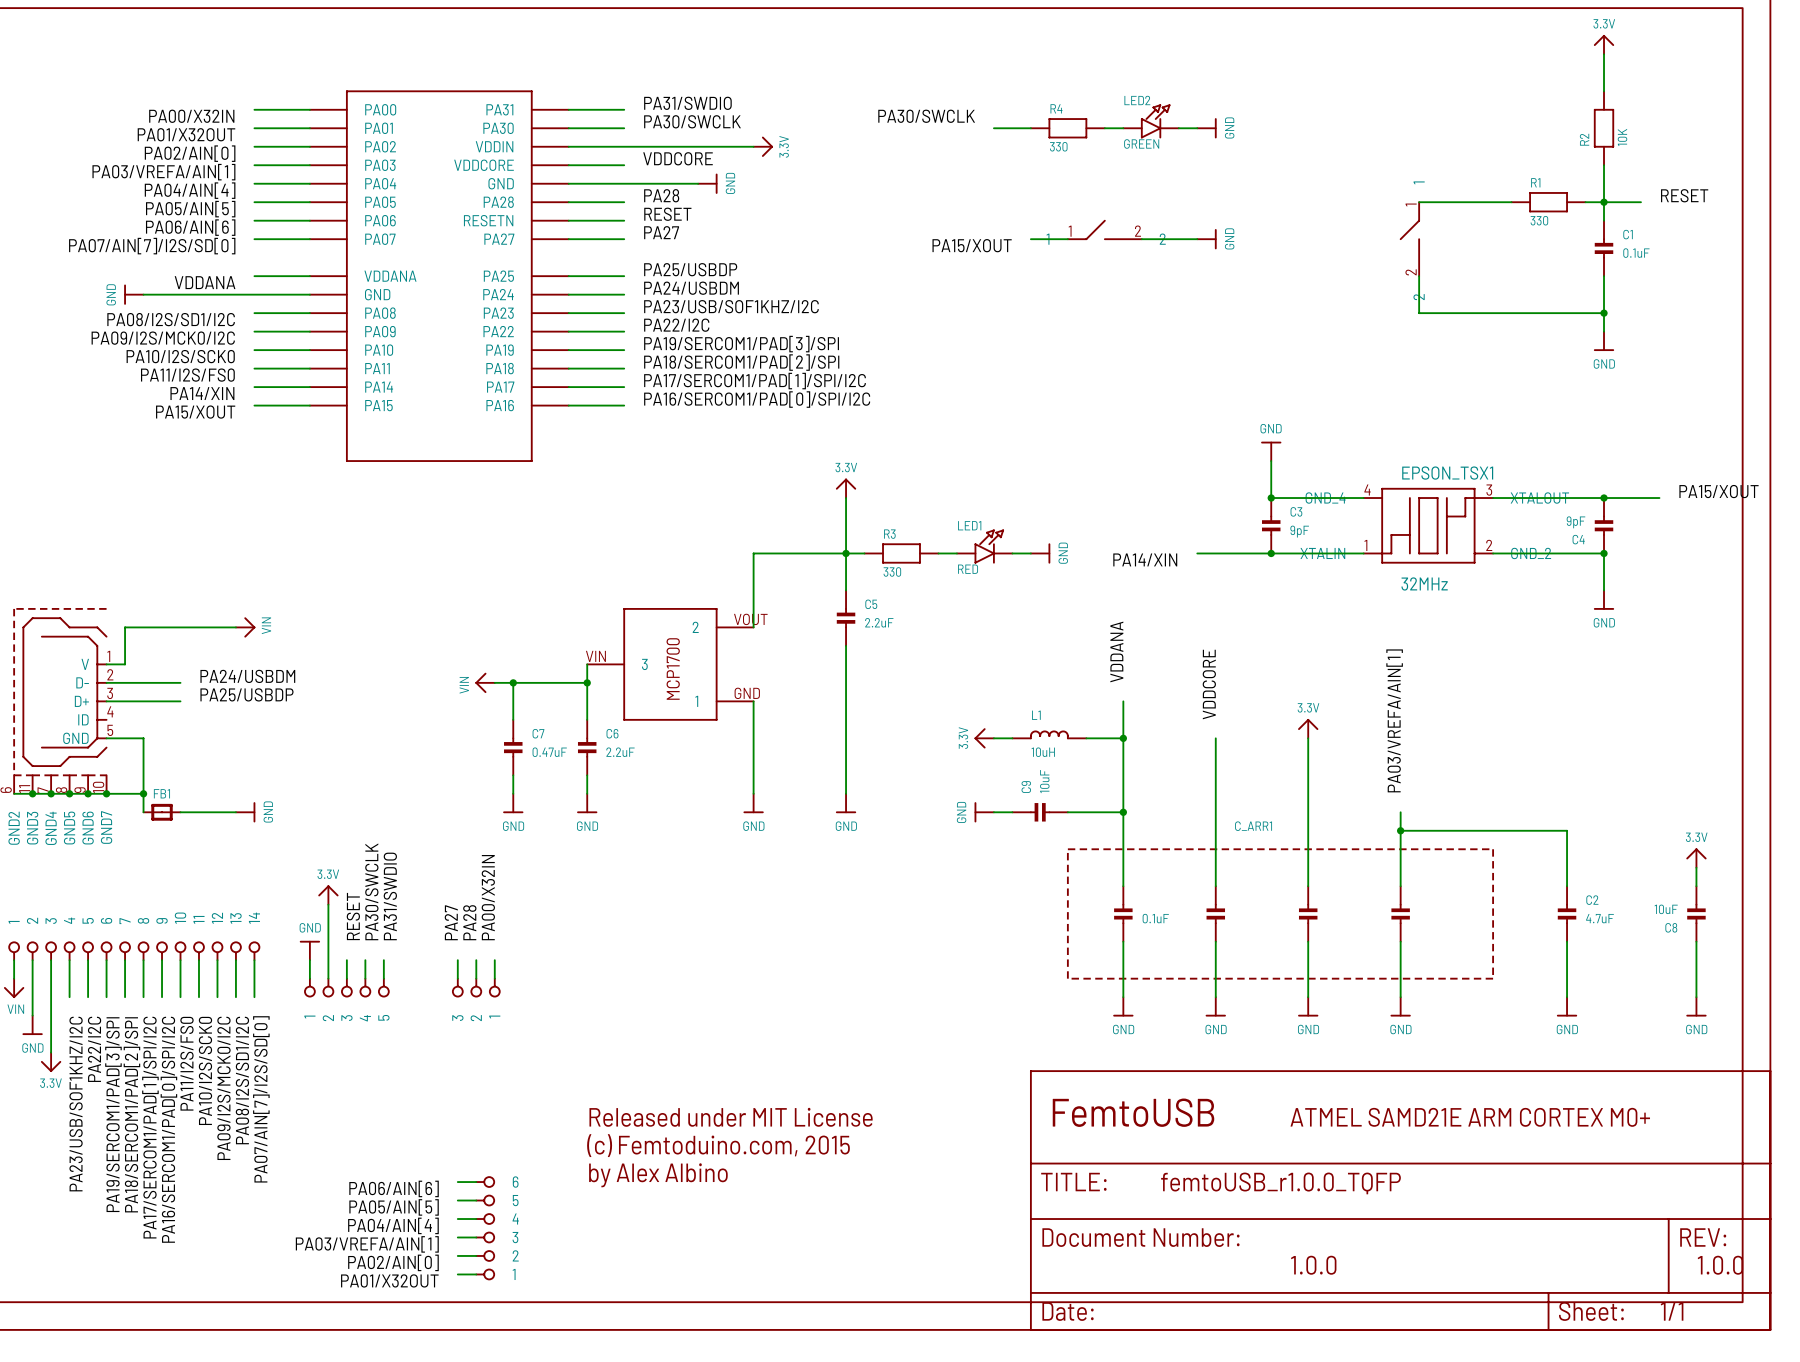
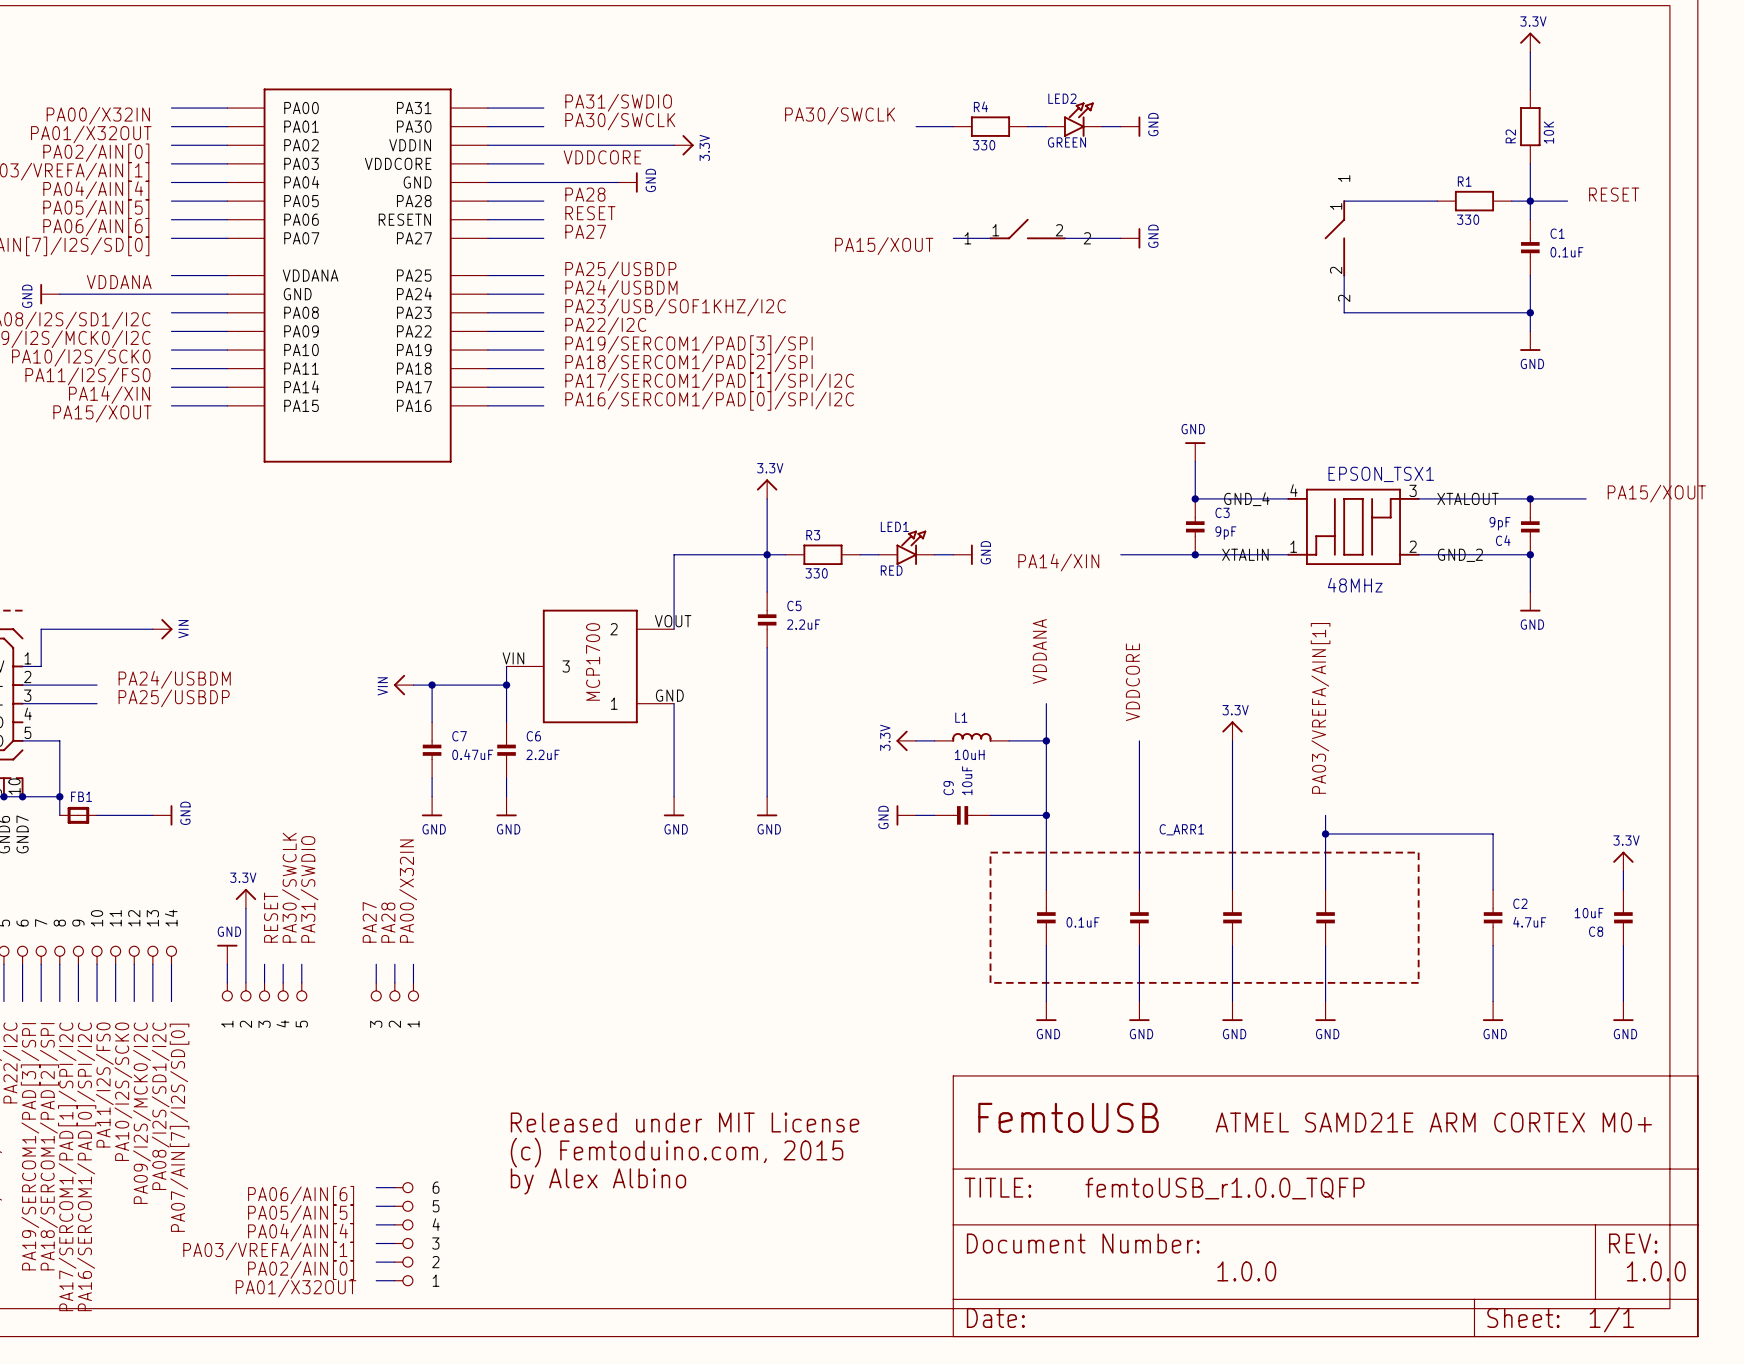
EPSON_TSX1 value: 32MHz (1424, 583) -> 48MHz (1355, 585)

